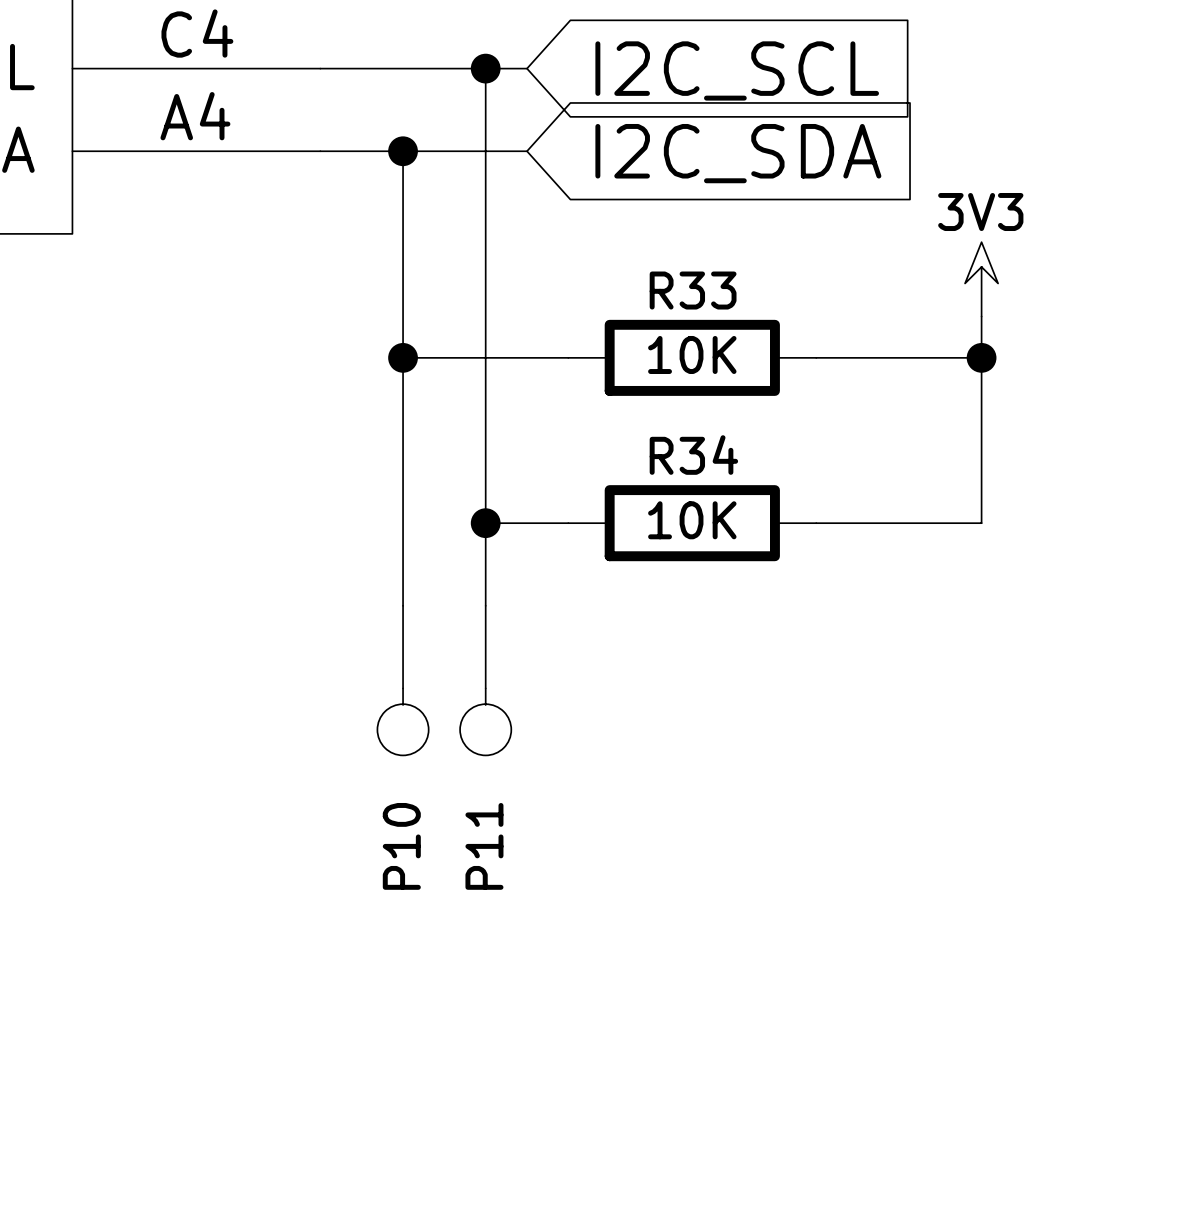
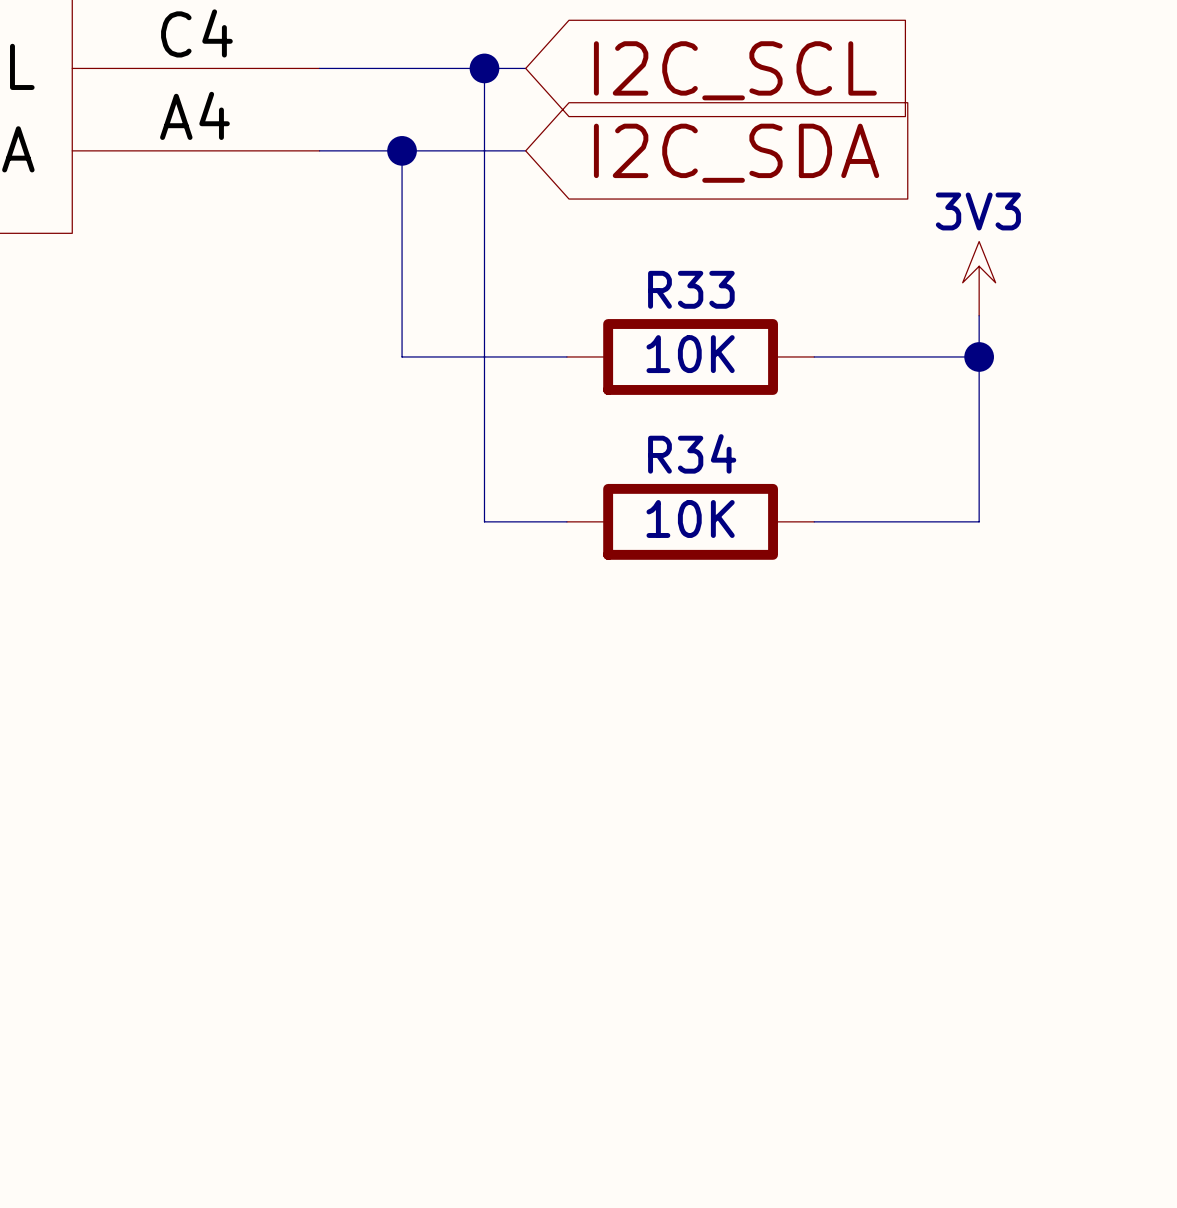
wire: (403, 357) (403, 605) -> none
junction: (403, 357) -> none
wire: (485, 523) (485, 605) -> none
junction: (485, 523) -> none
P10: (403, 680) -> none
P11: (485, 680) -> none

